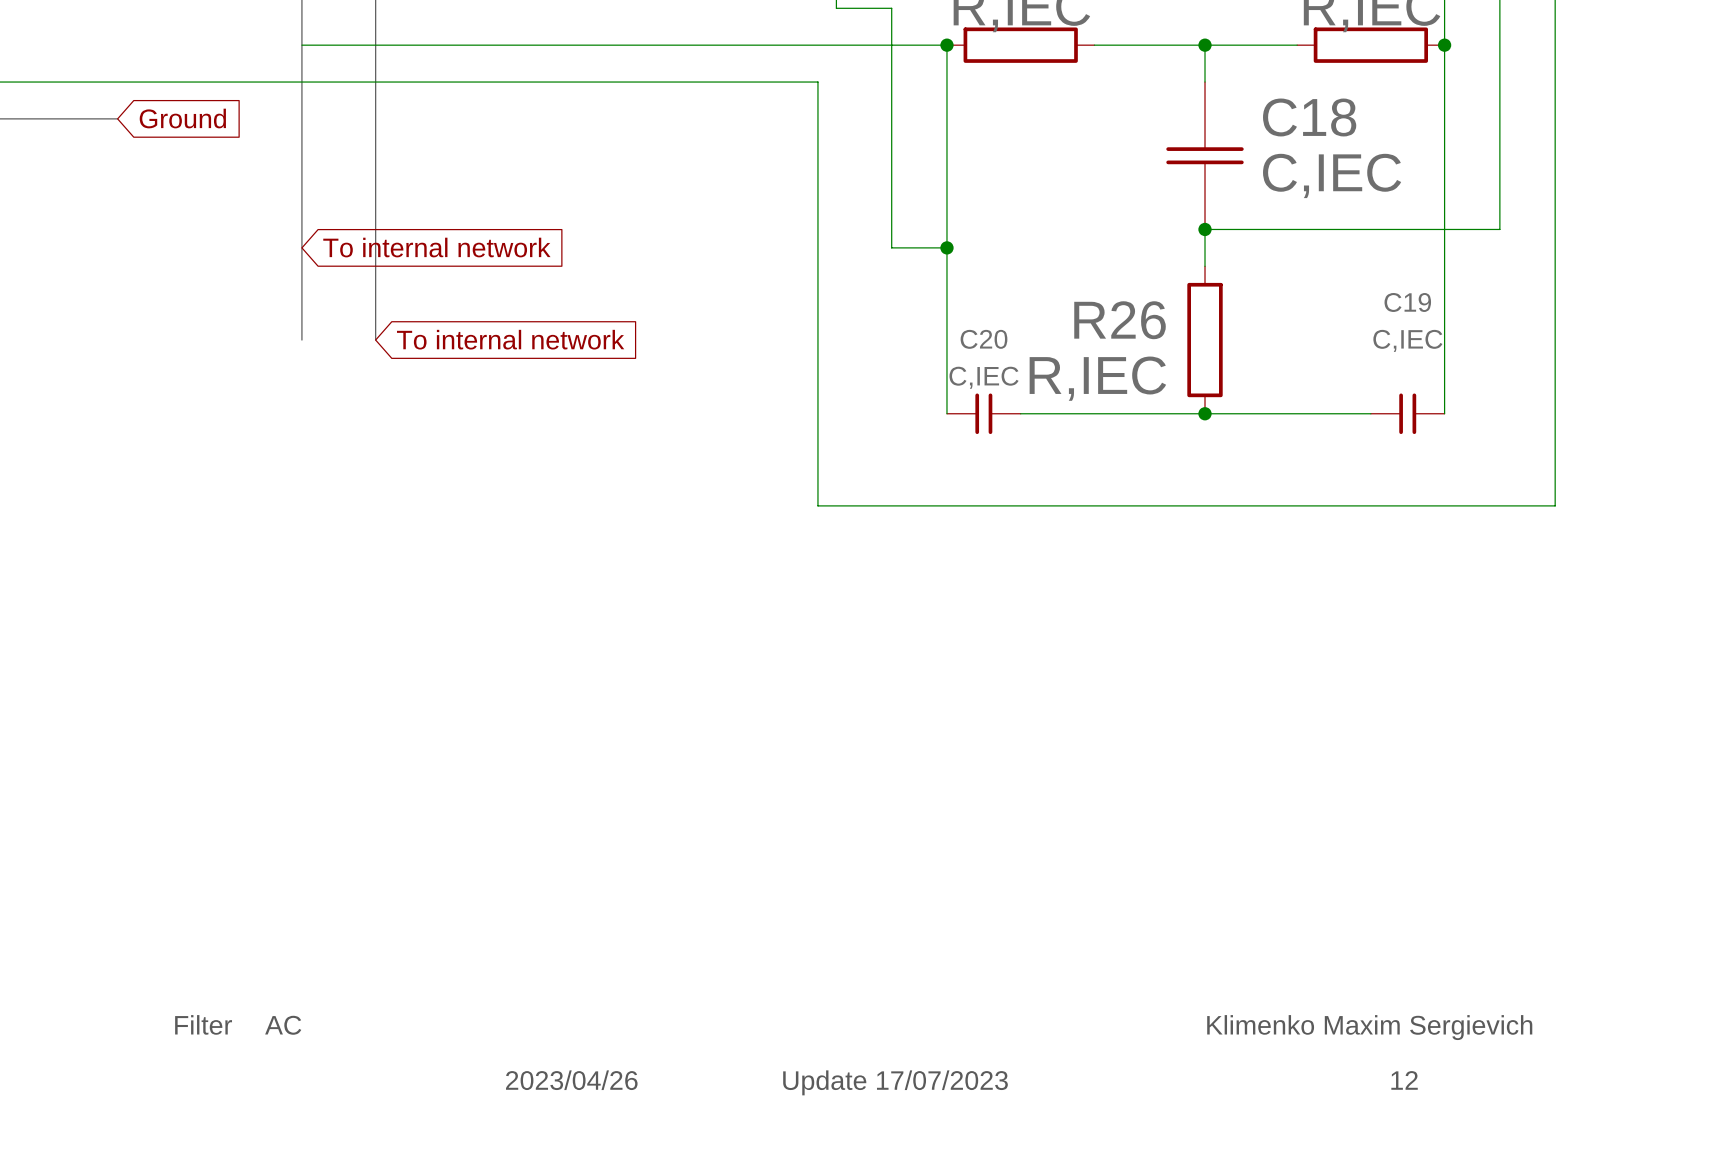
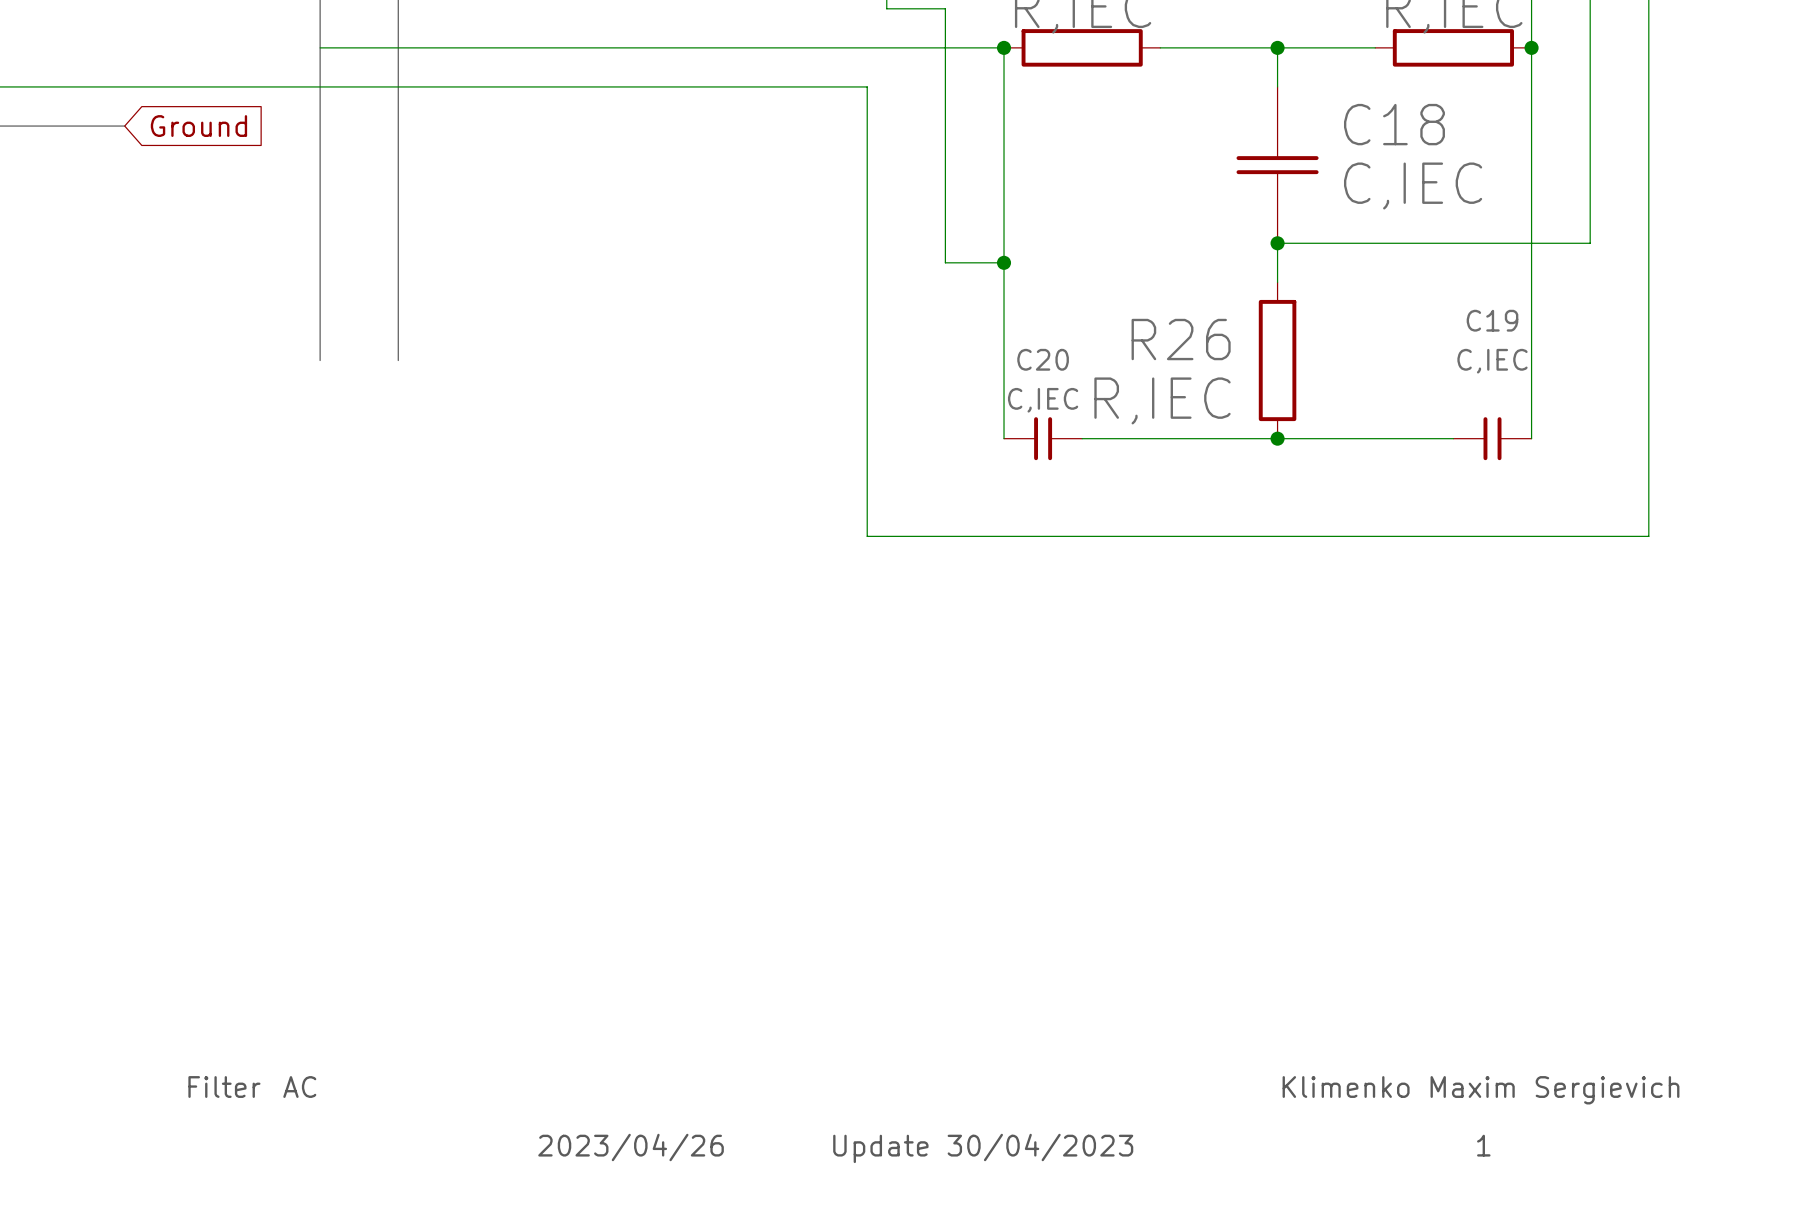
global label: To internal network (436, 247) -> none
global label: To internal network (510, 339) -> none
text: 12 (1404, 1080) -> 1 (1483, 1145)
text: Update 17/07/2023 (895, 1082) -> Update 30/04/2023 (983, 1148)

